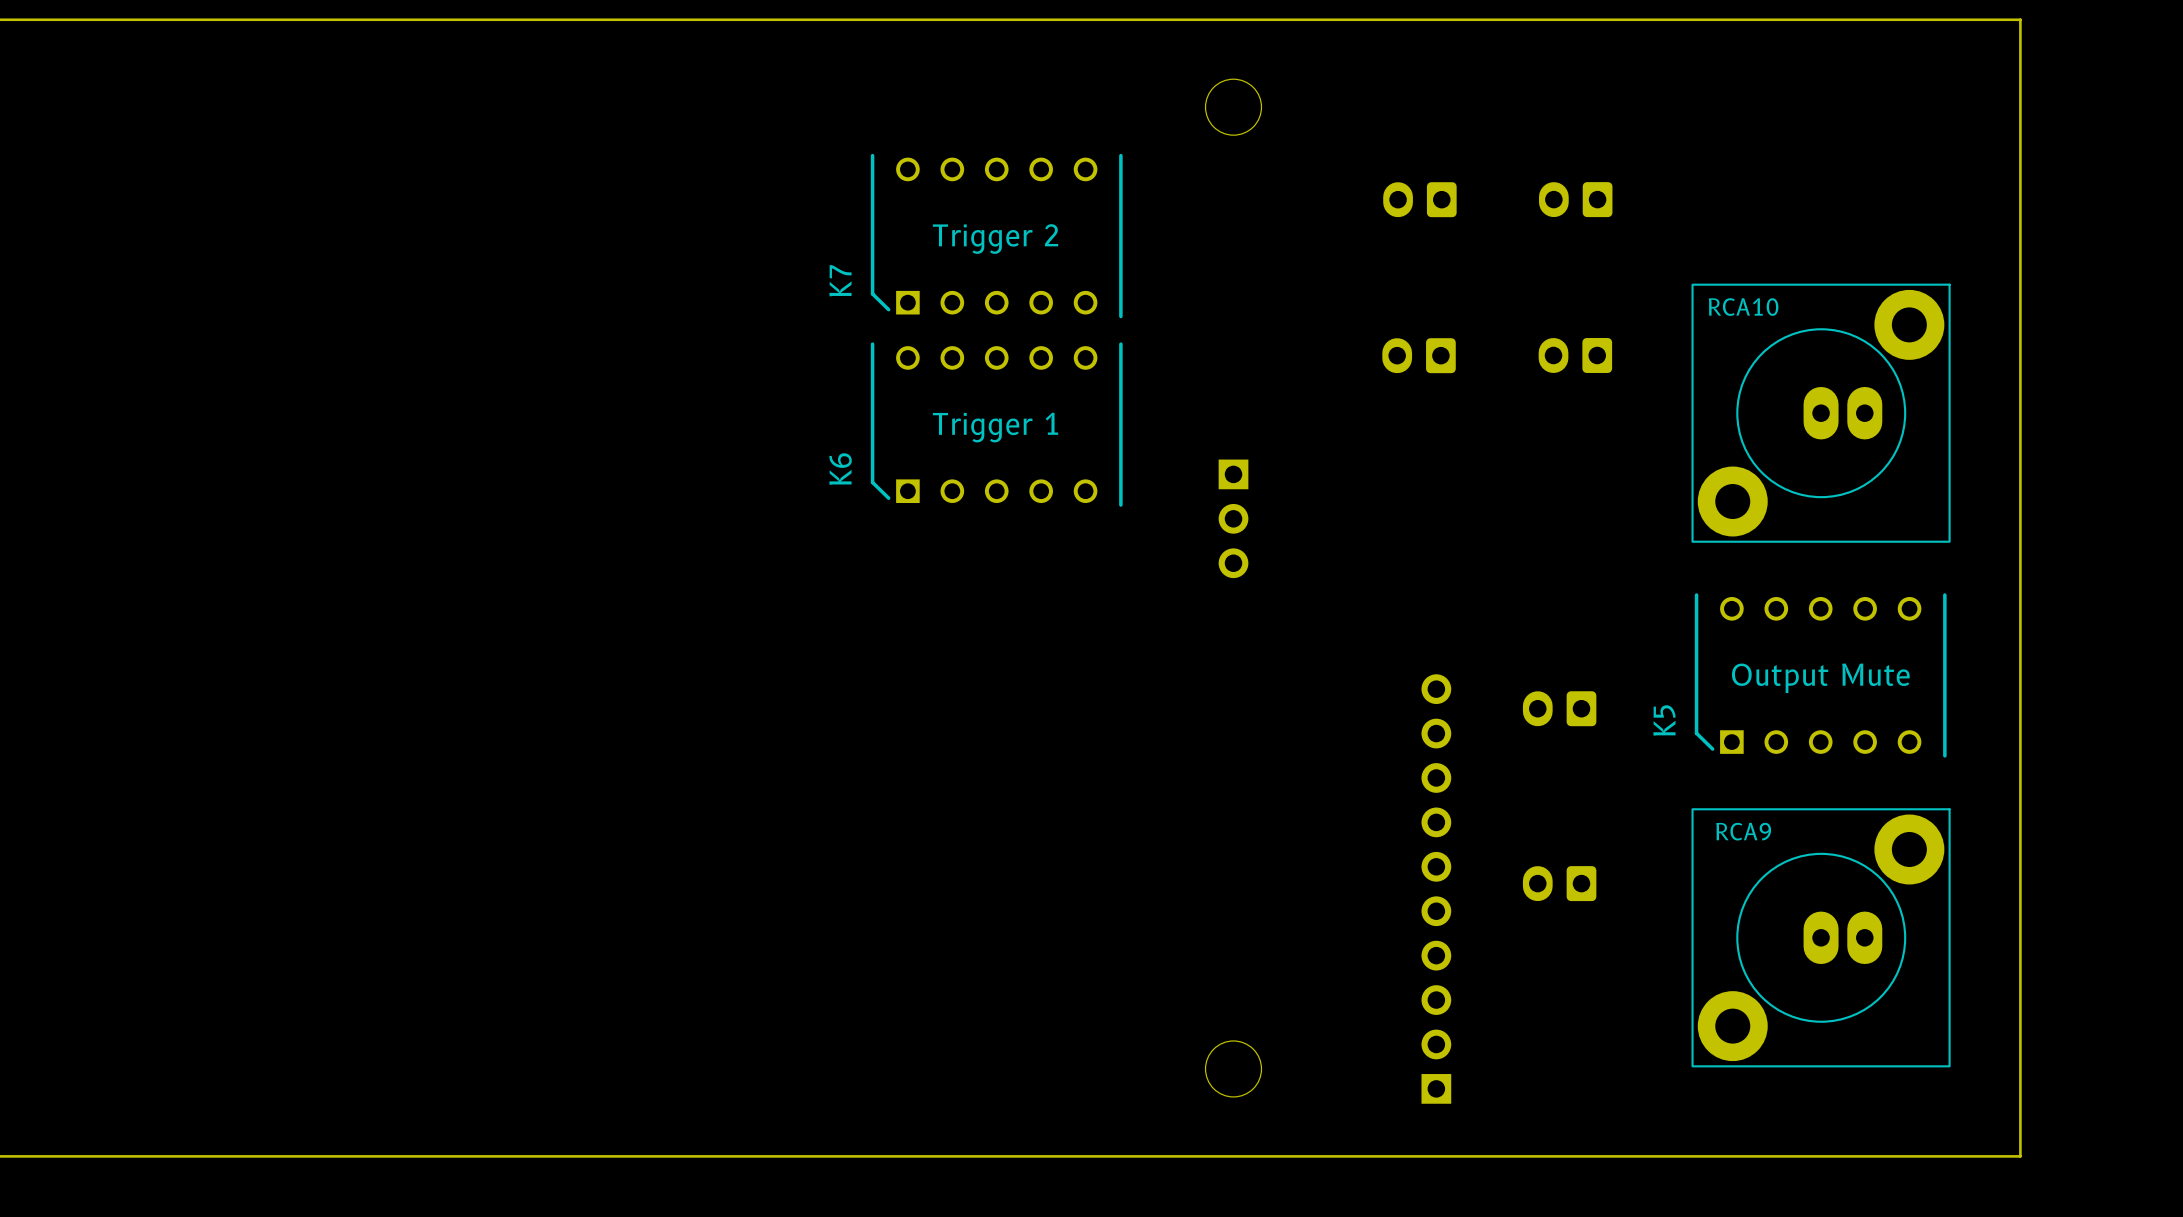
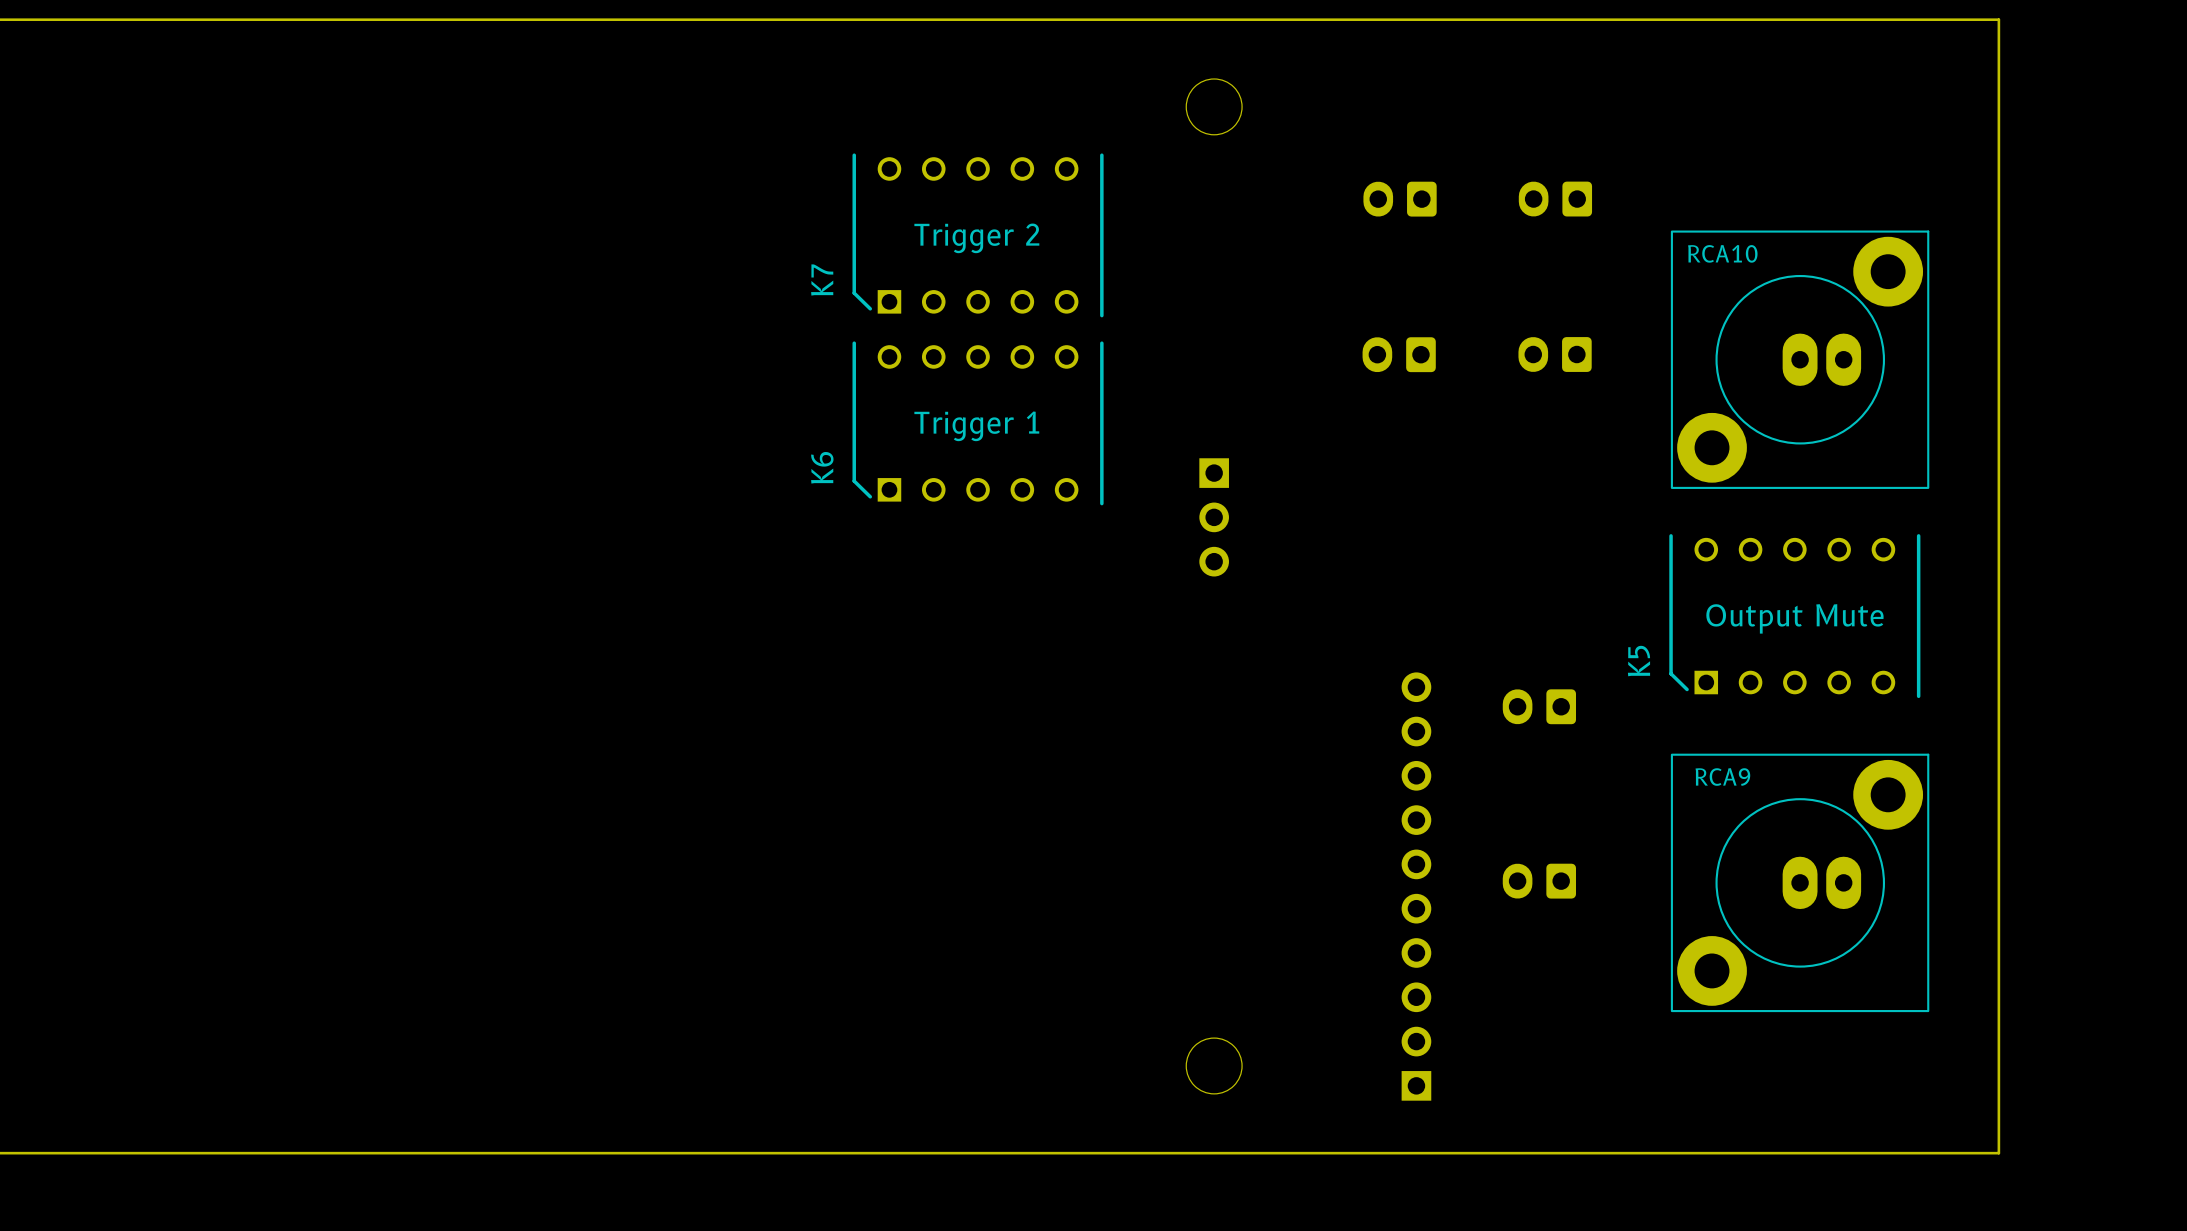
RCA10 position: (1821, 413) -> (1800, 359)
K5 position: (1820, 675) -> (1794, 616)
RCA9 position: (1821, 937) -> (1800, 882)

